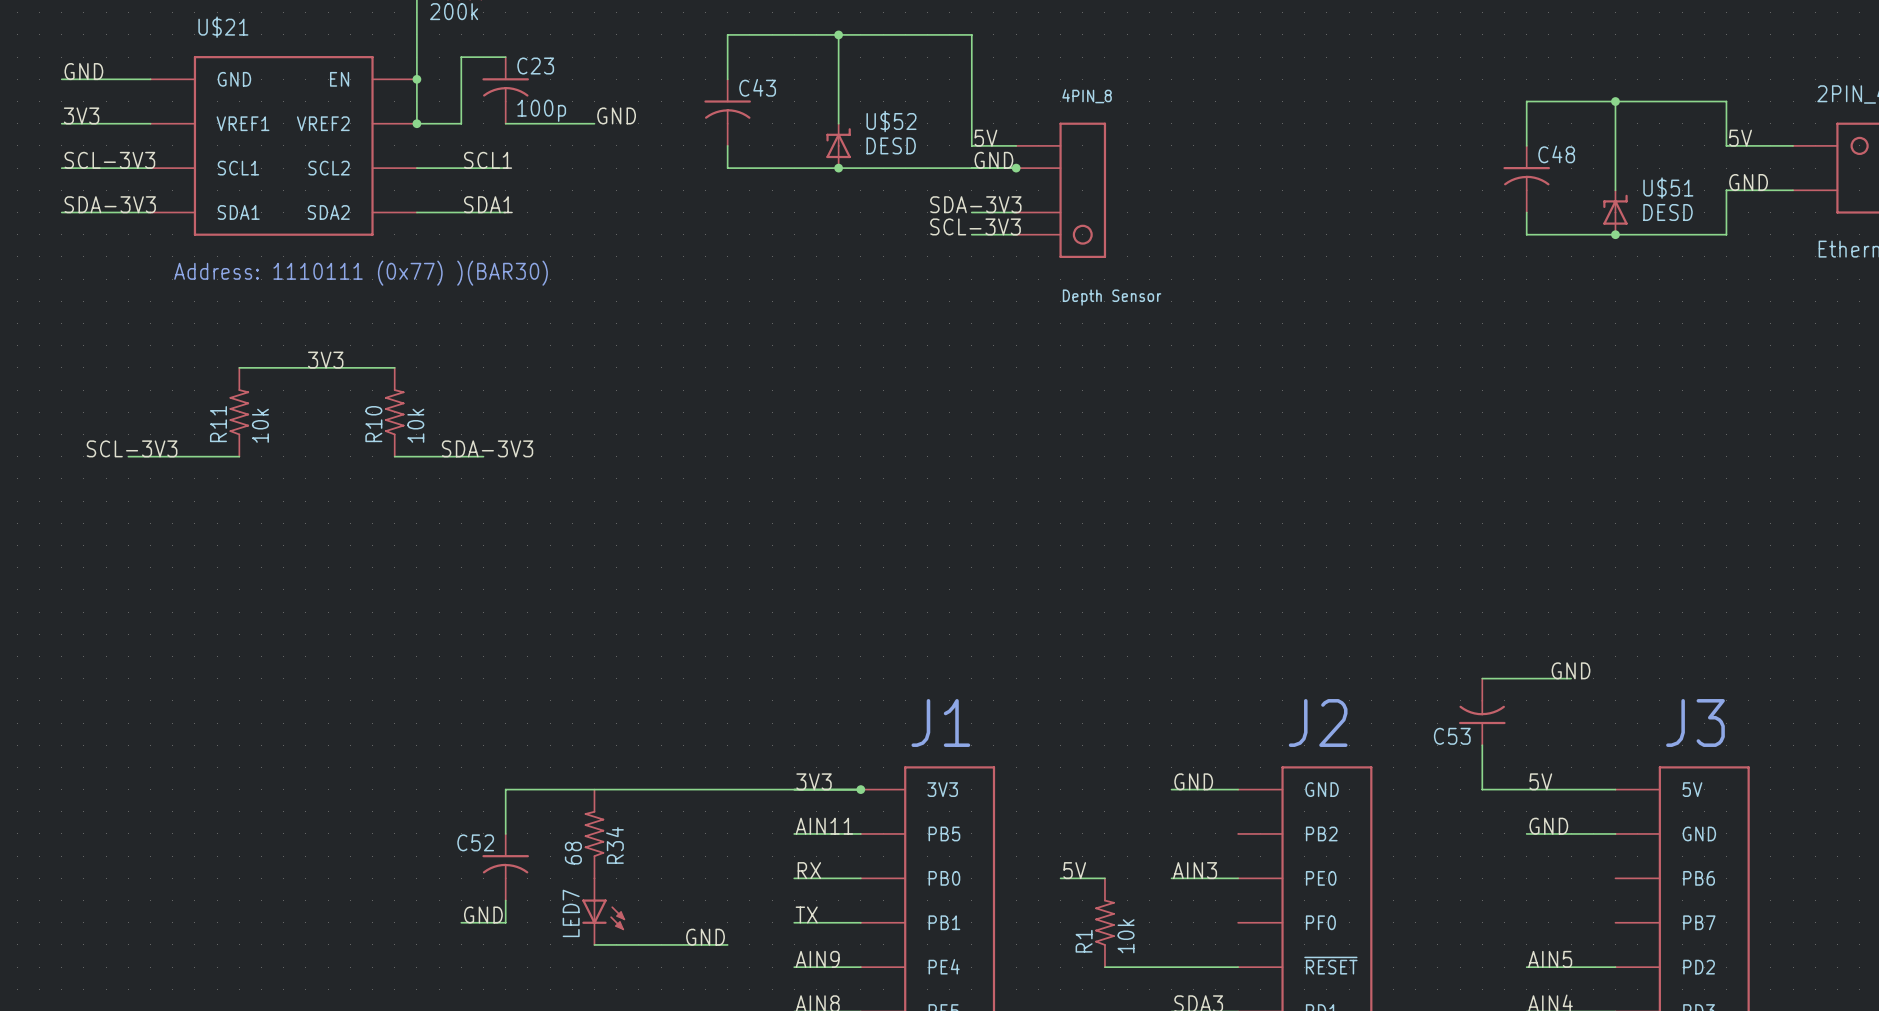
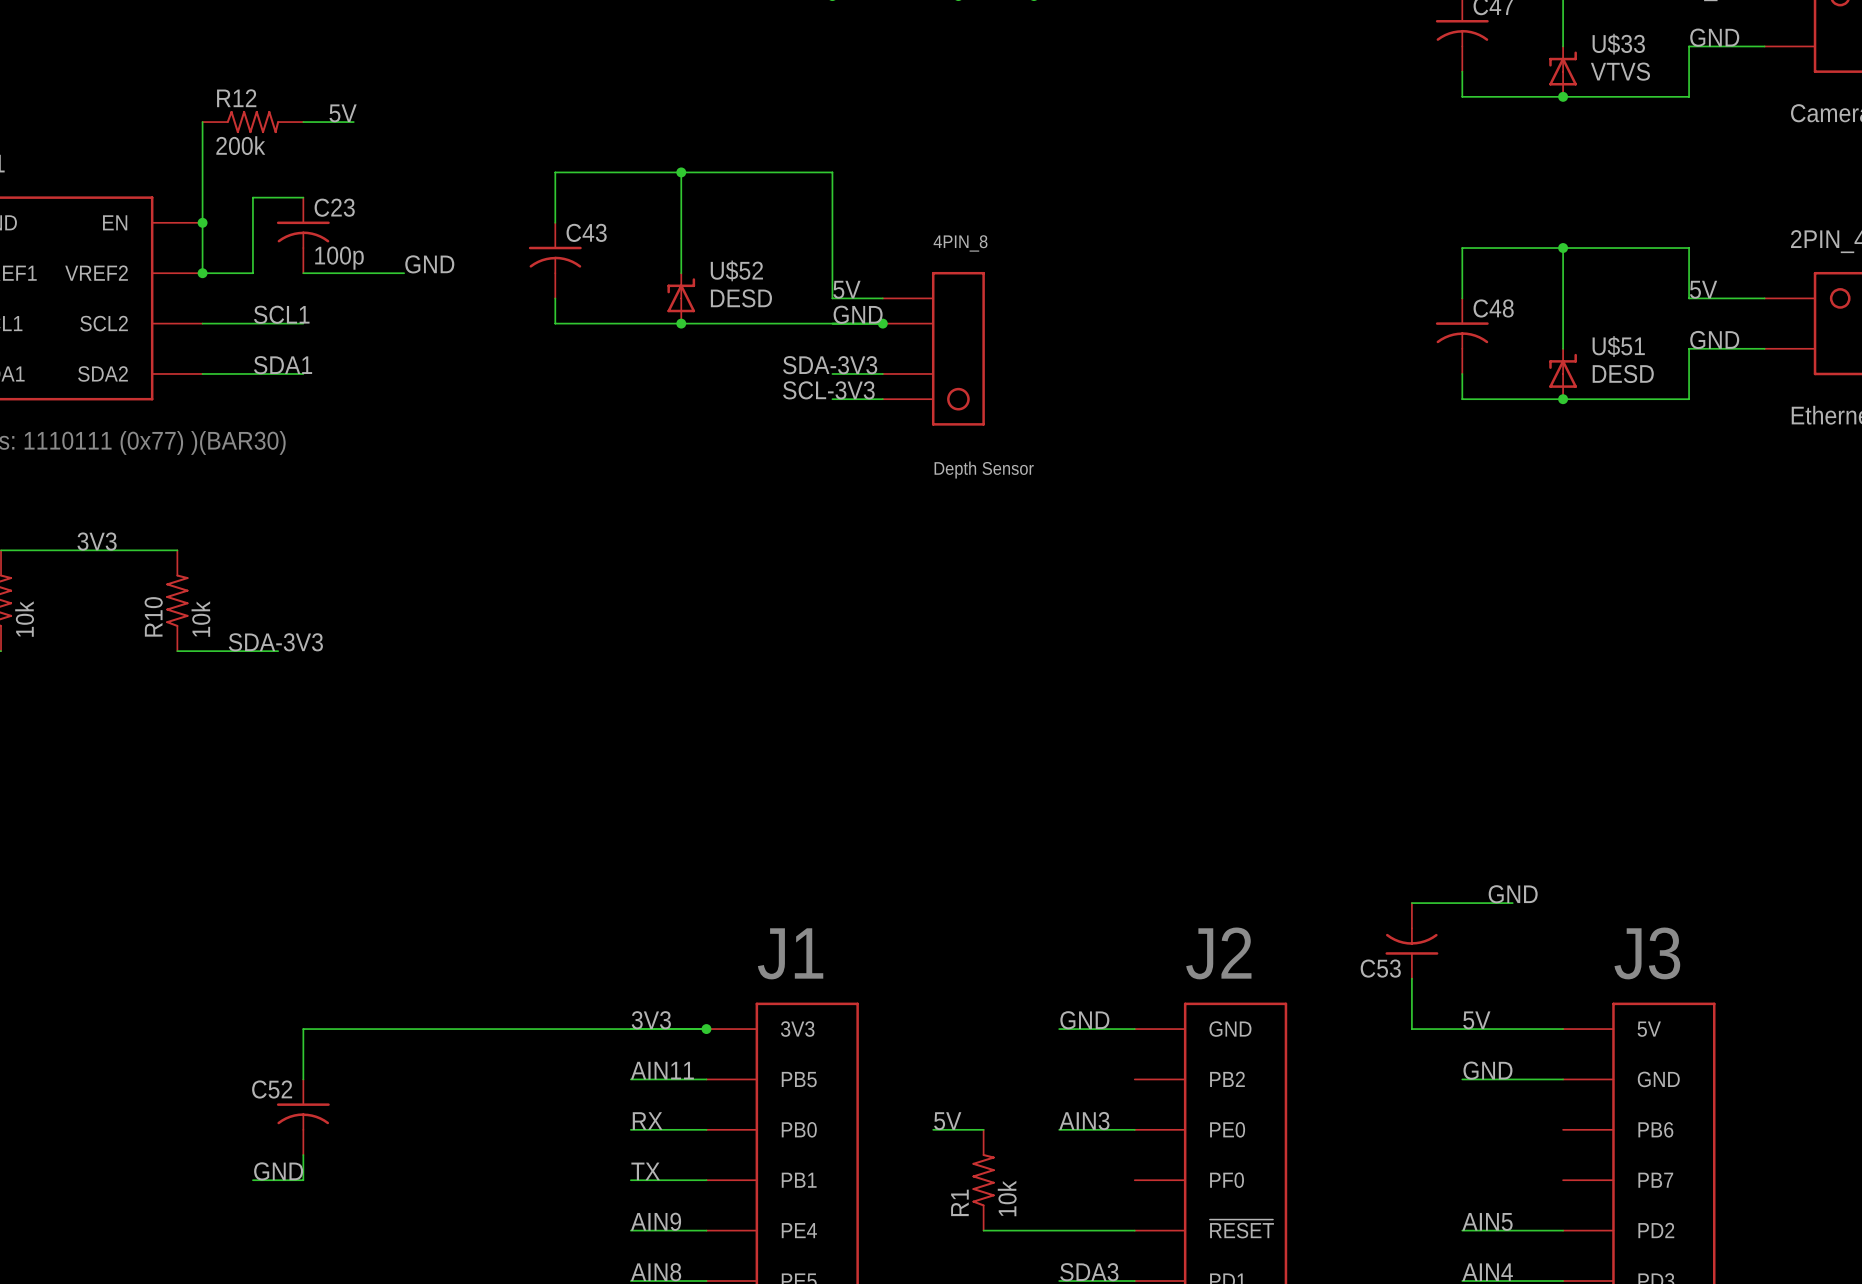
R34: 68 (594, 833) -> none
LED7: (603, 911) -> none
label: GND (705, 937) -> none
wire: (594, 944) (727, 944) -> none

